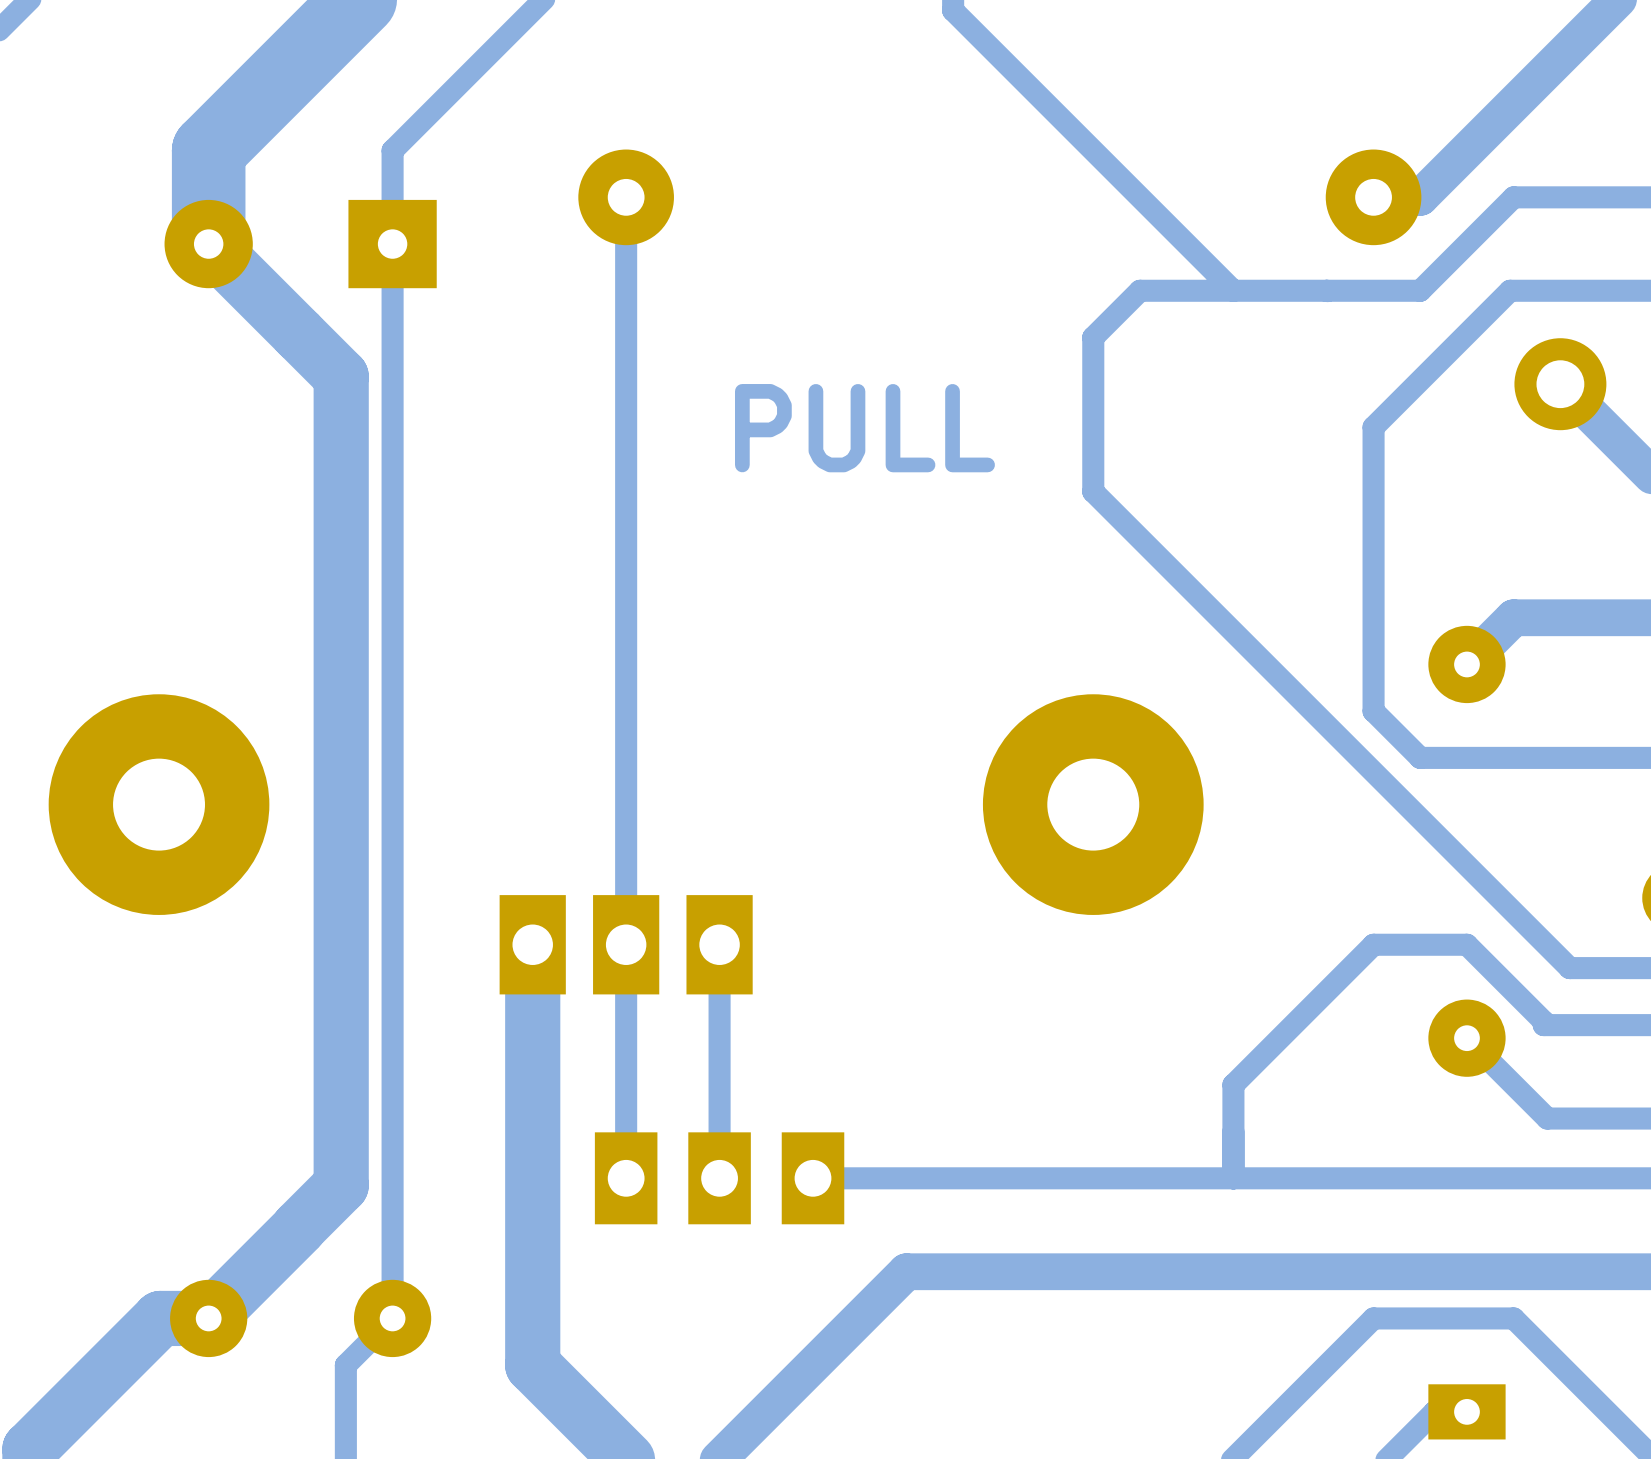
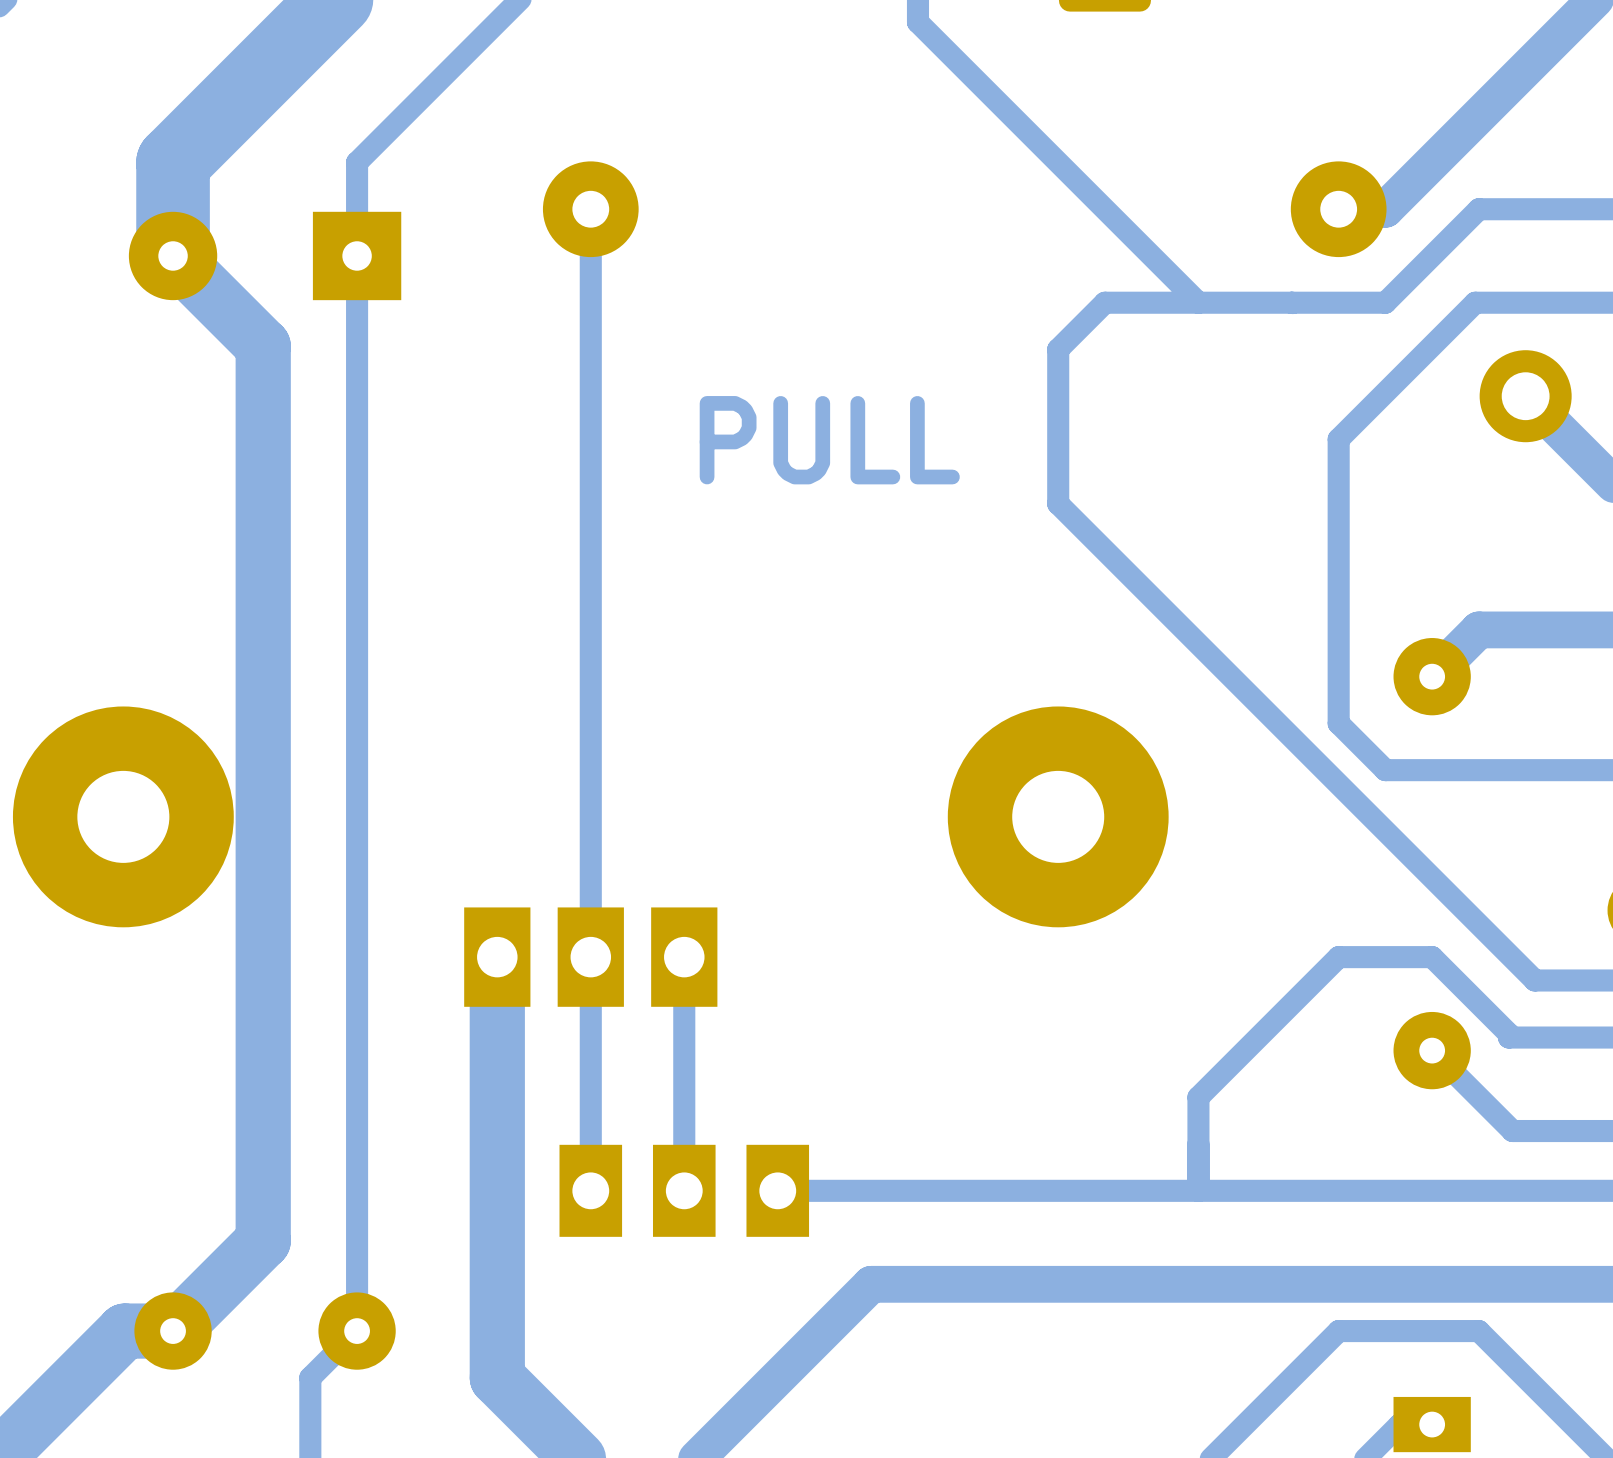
bottom track: (298, 334) (341, 376) (341, 1185) (298, 1227) -> (263, 346) (263, 1240)

